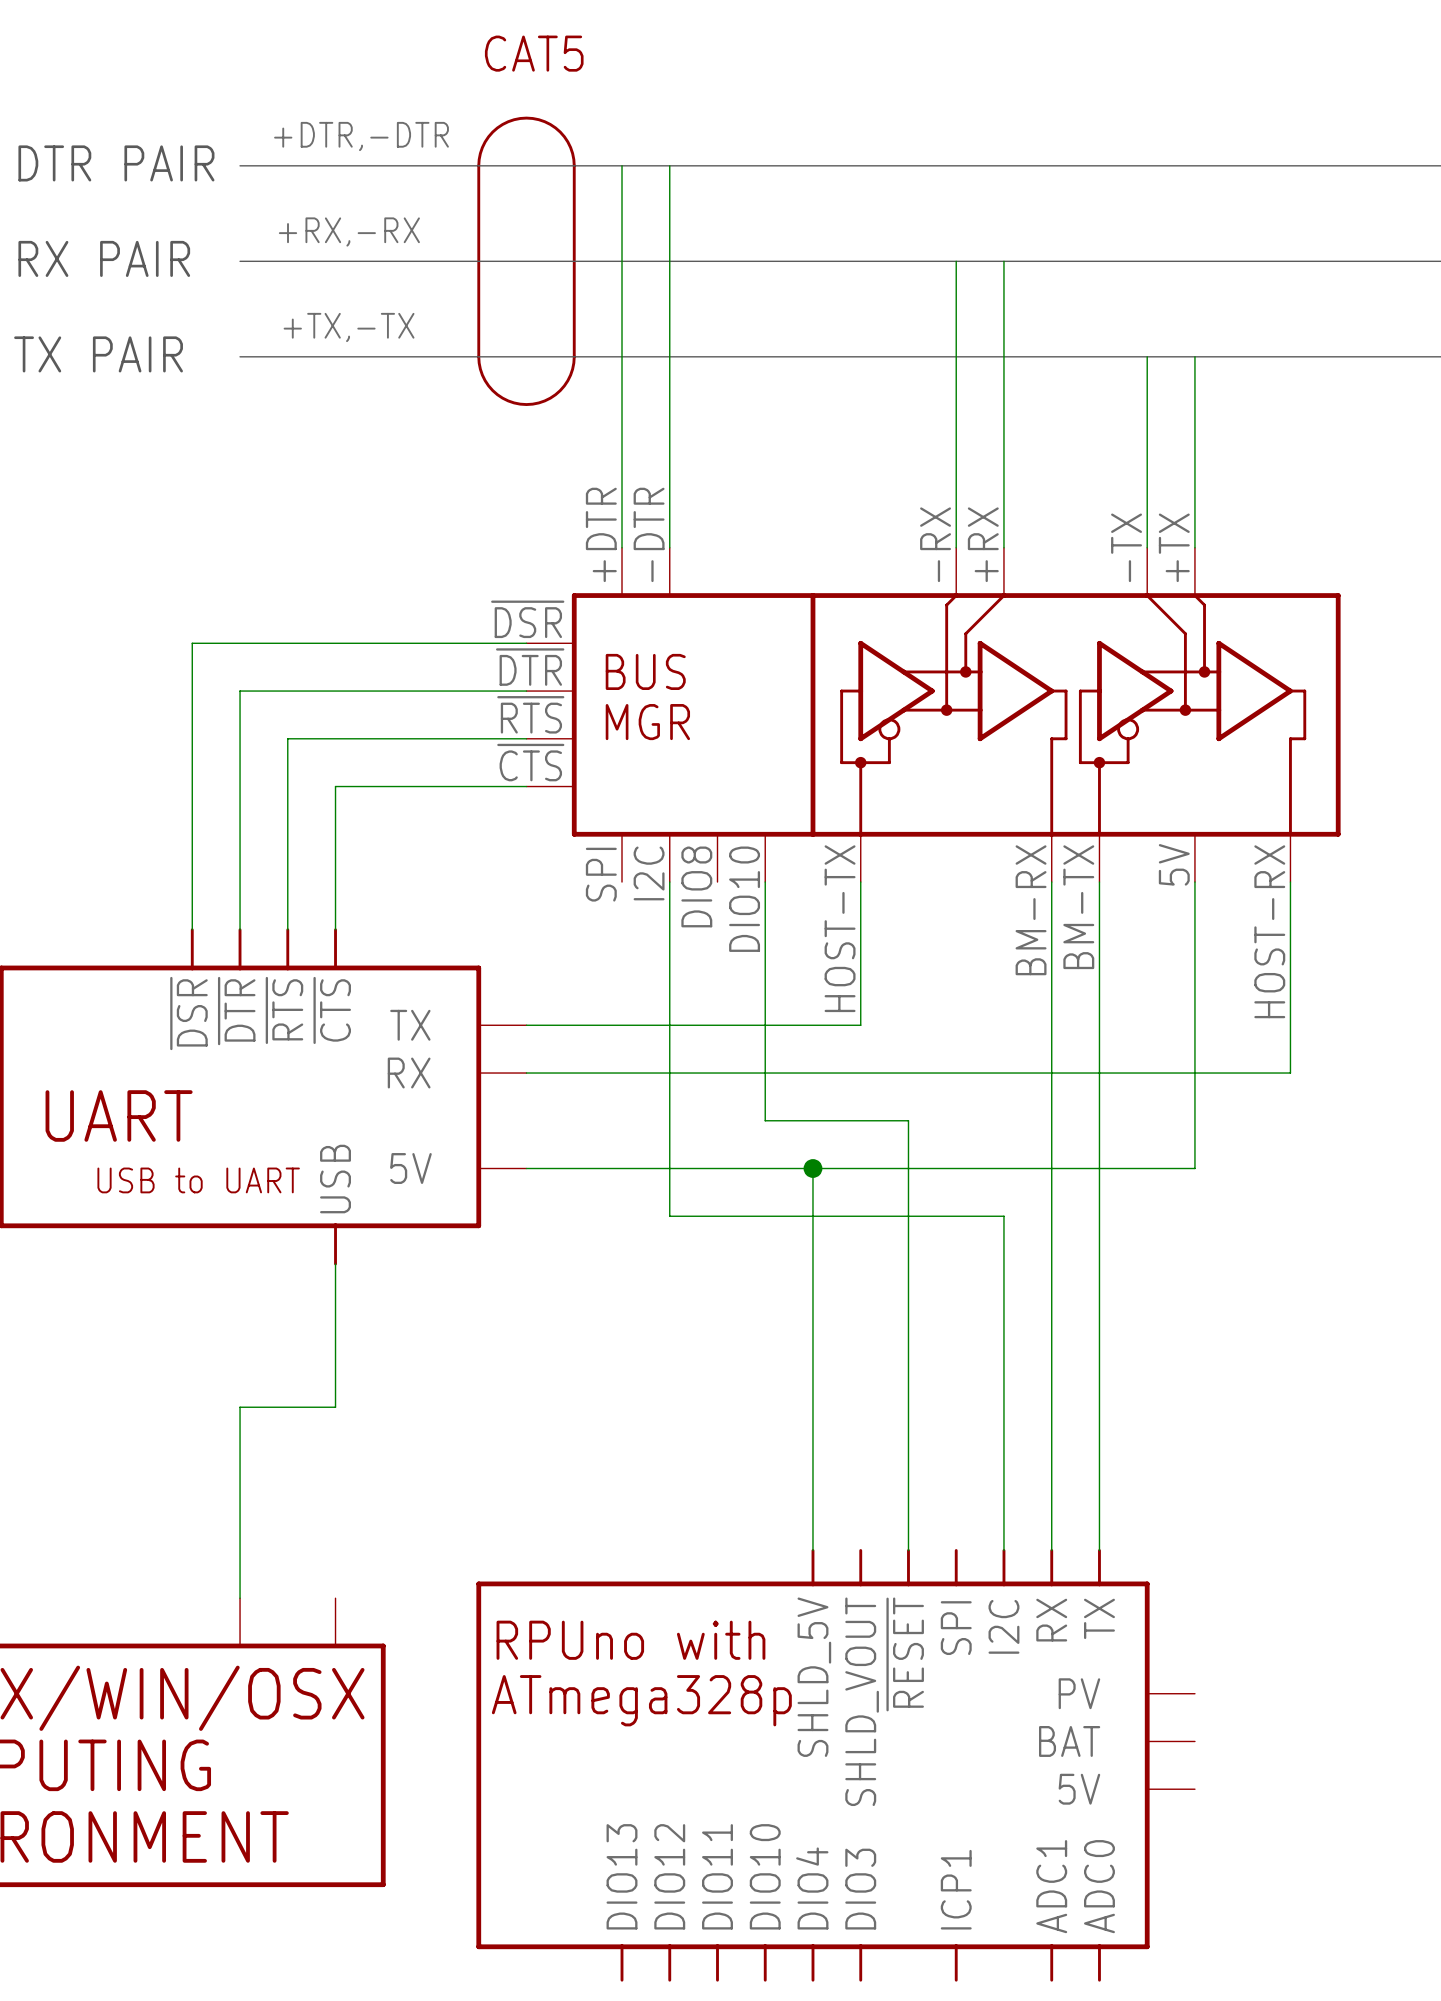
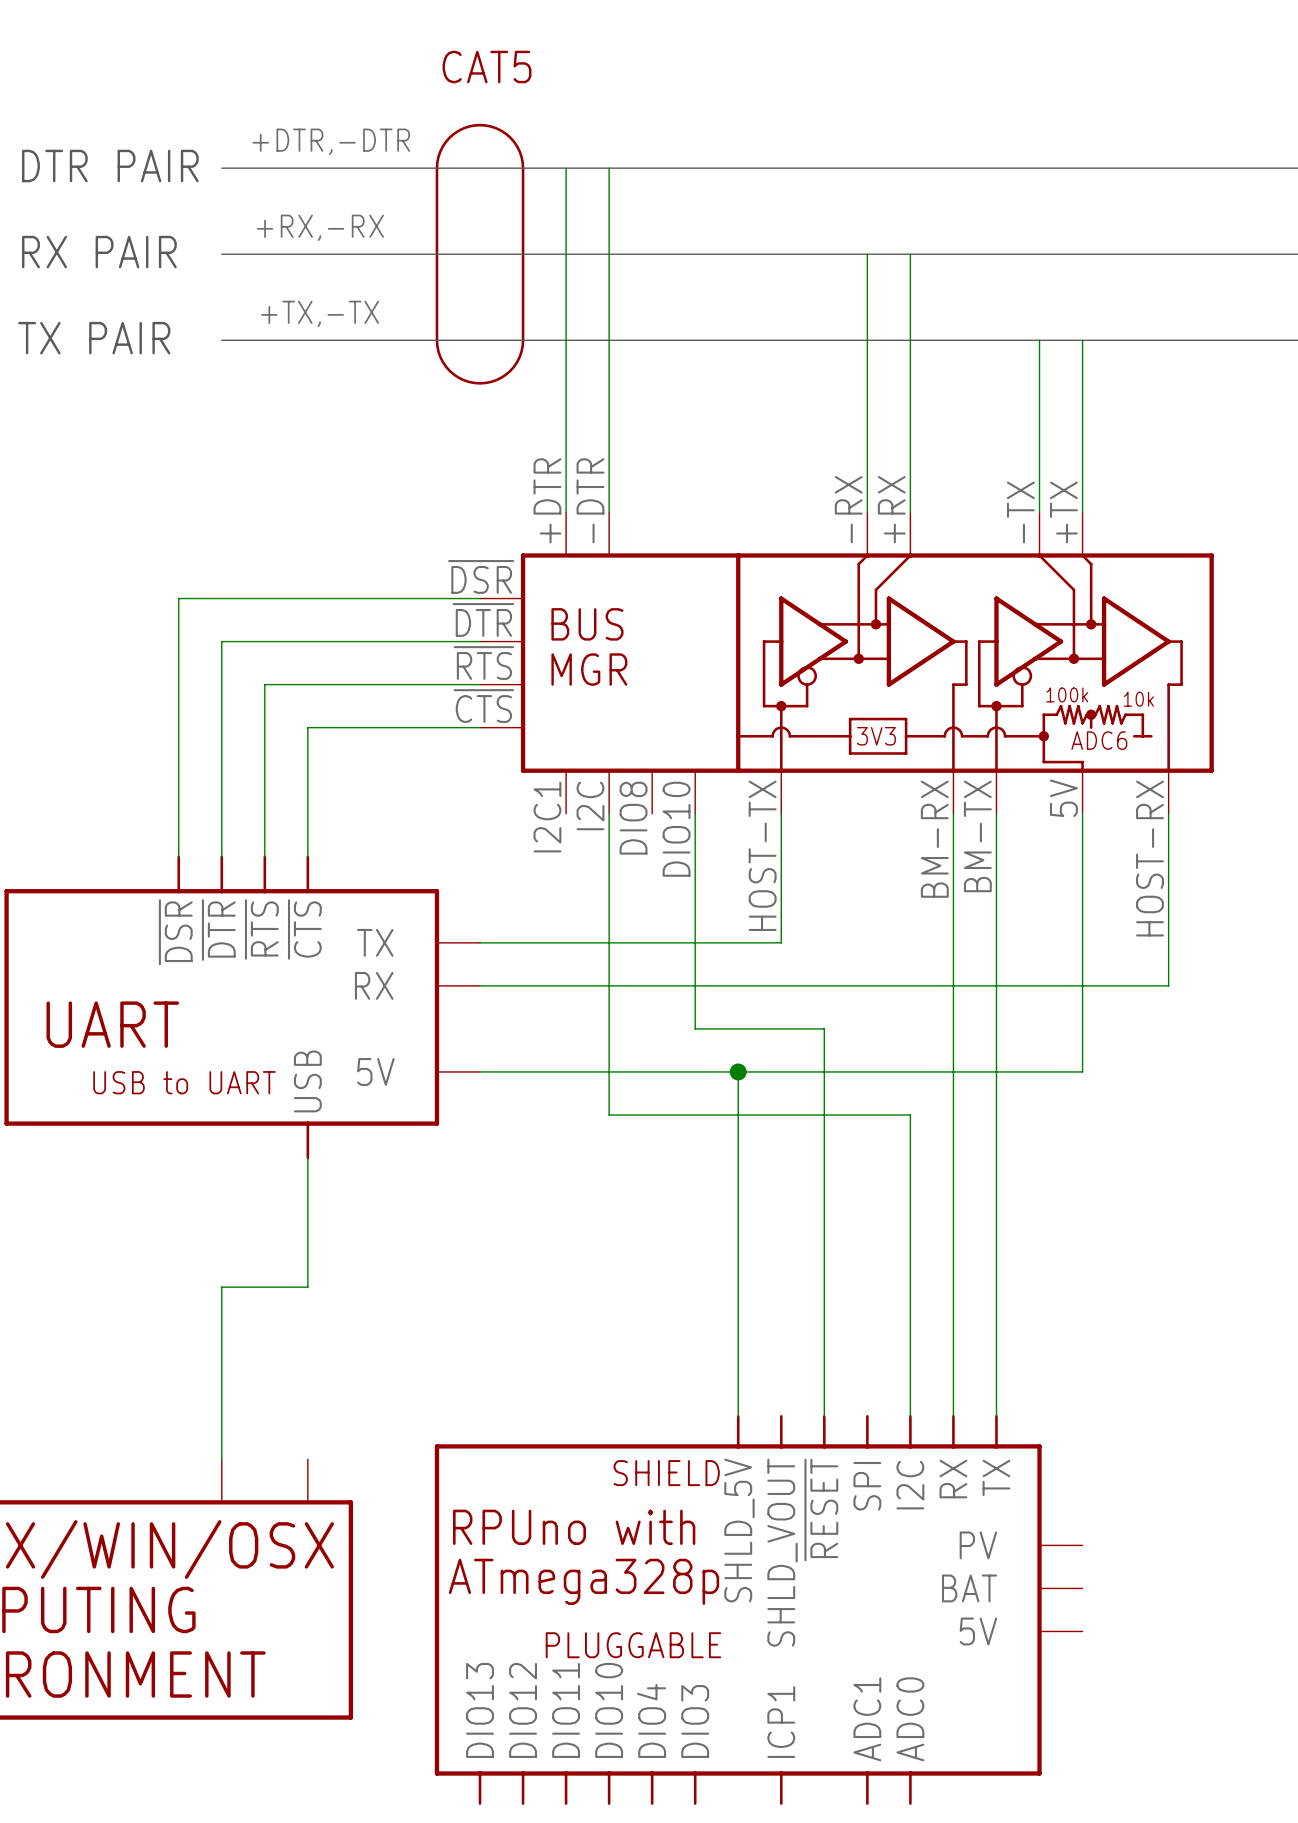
part symbol: [526, 547, 1341, 883] -> [480, 512, 1214, 814]
part symbol: [476, 1549, 1195, 1982] -> [434, 1414, 1083, 1805]

